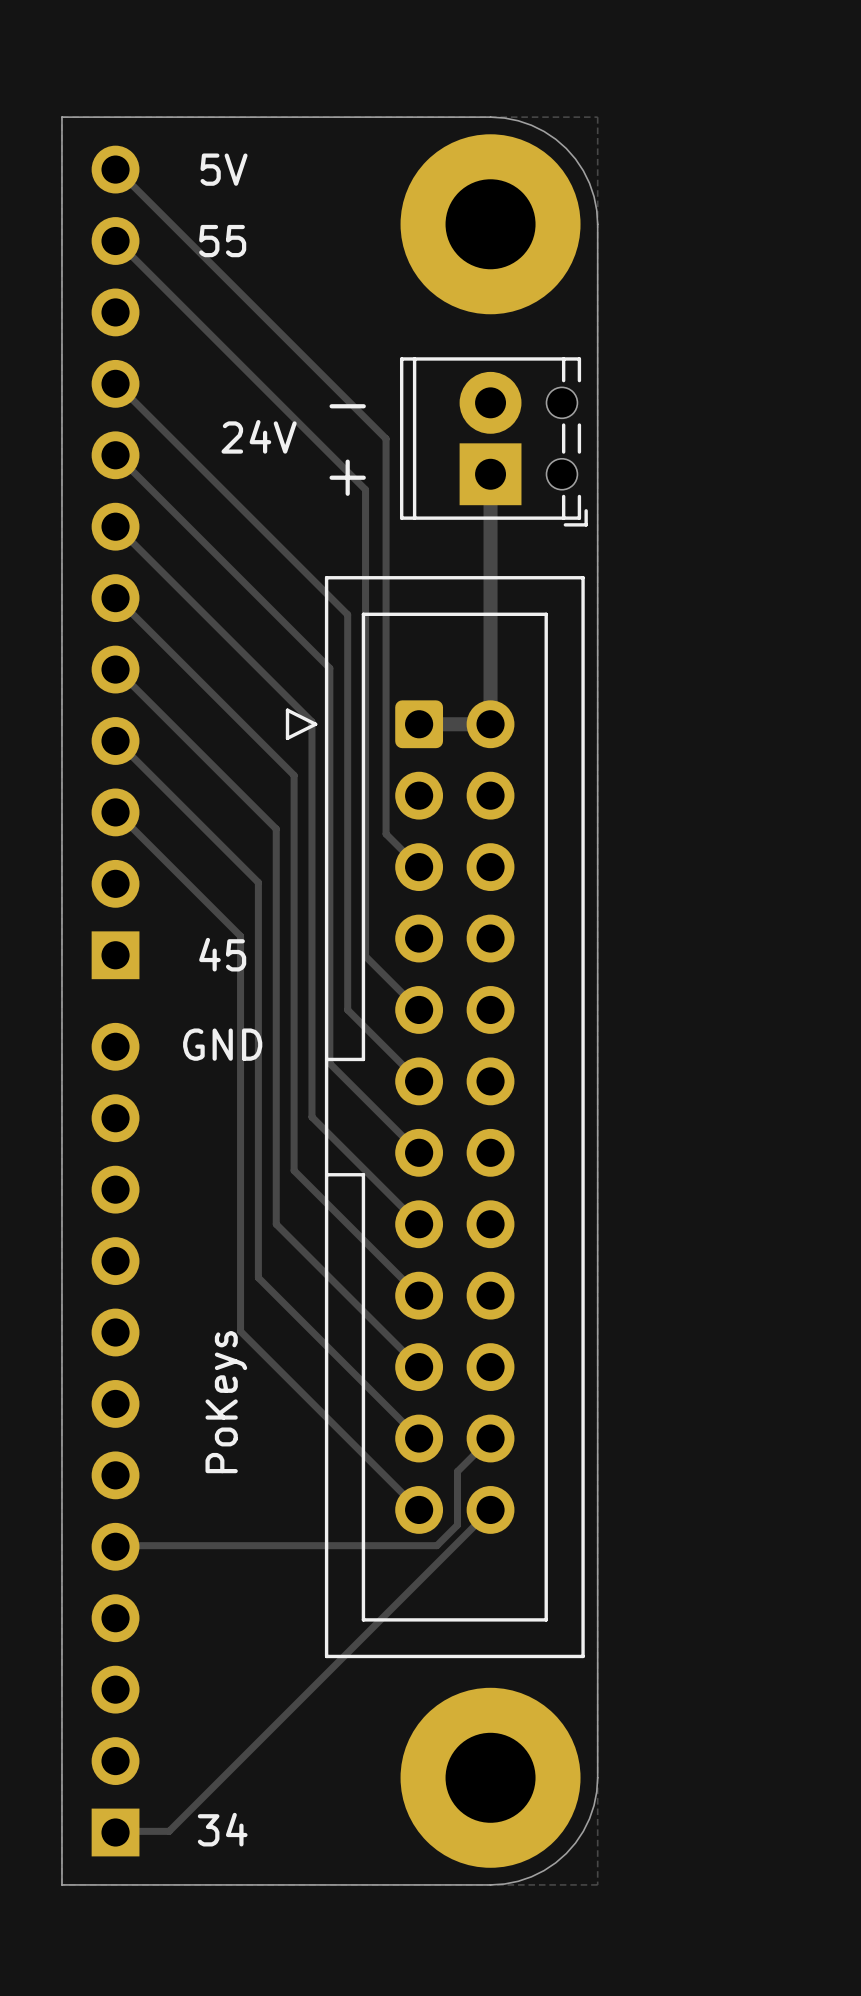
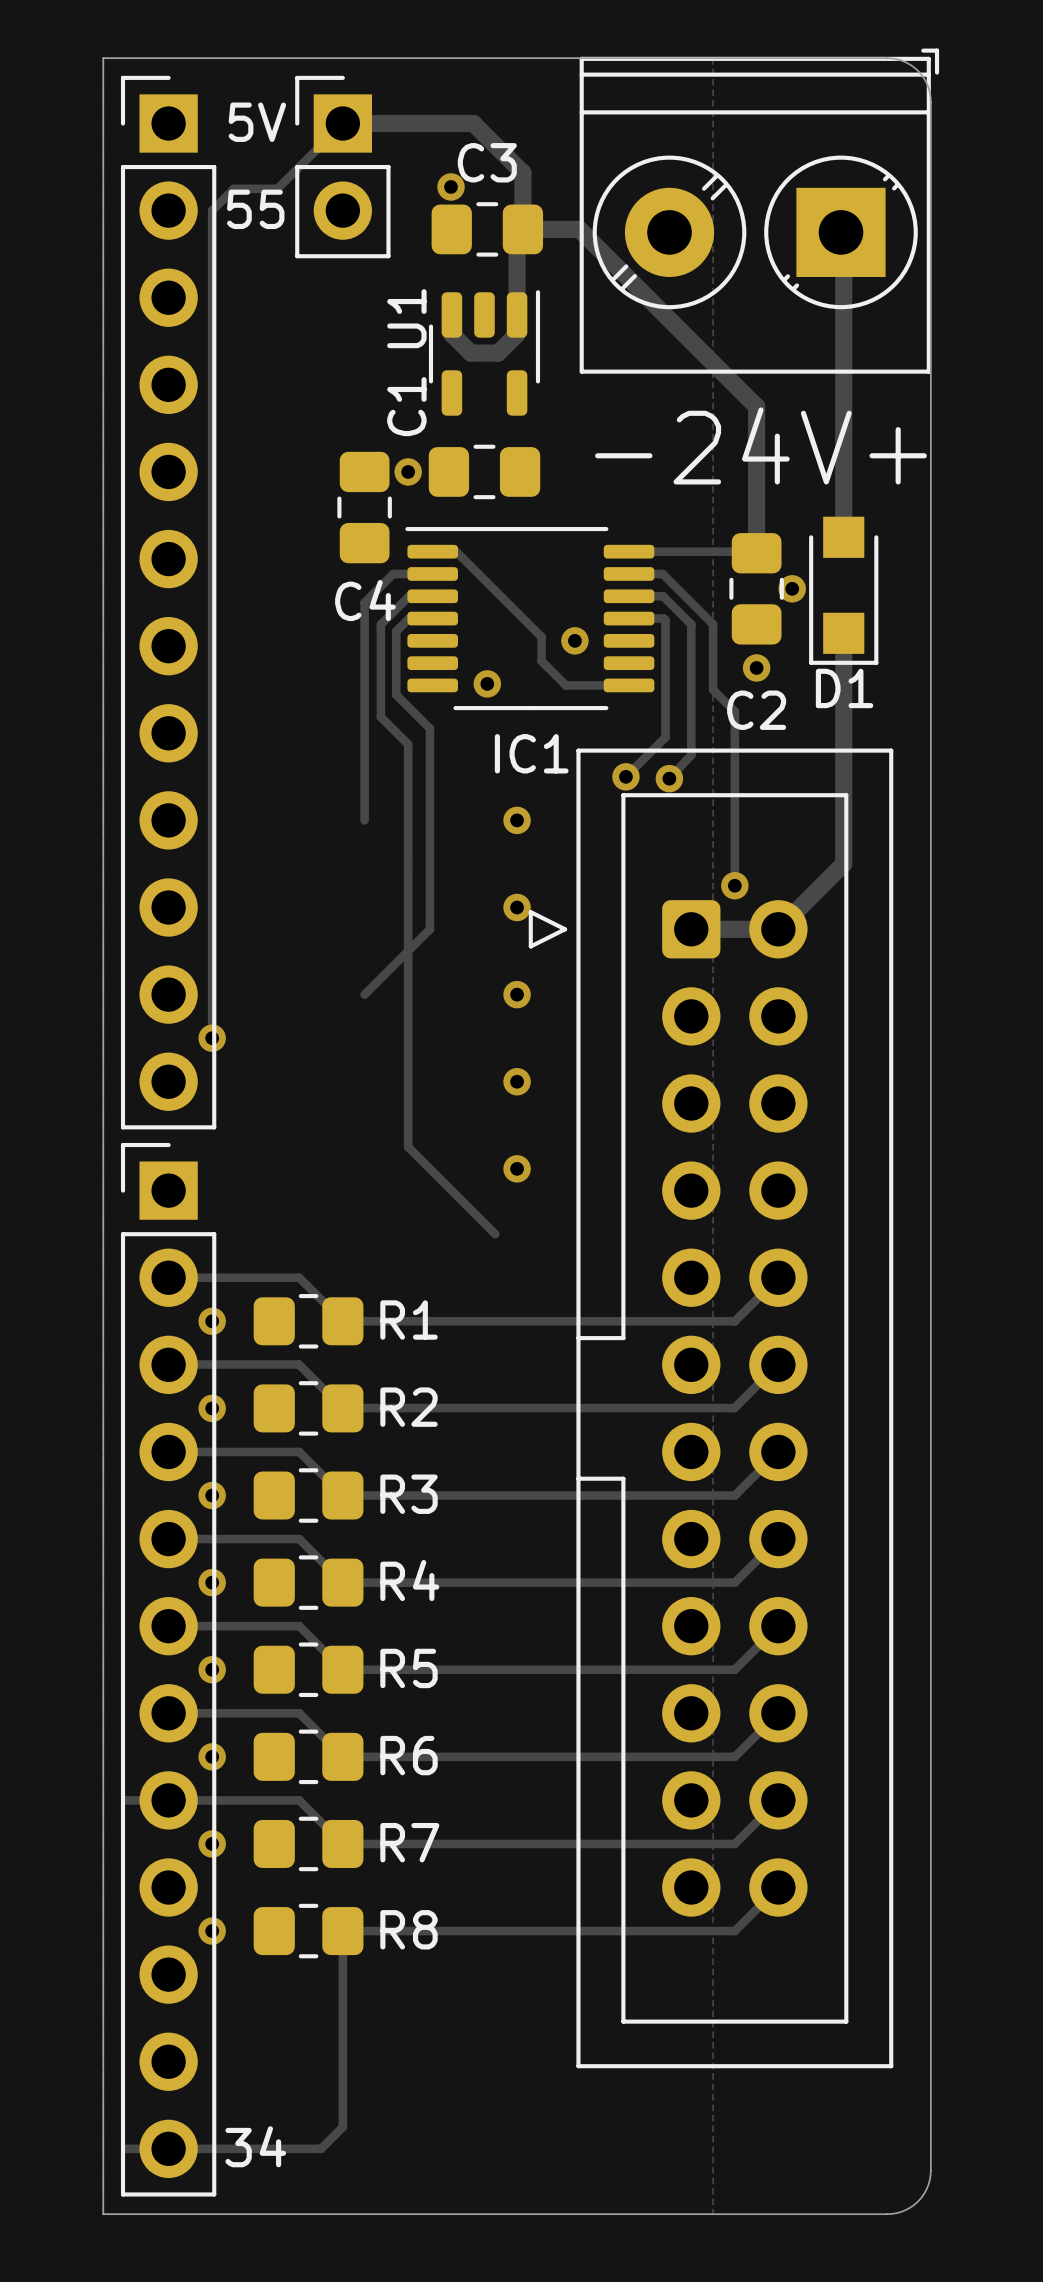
board edge: (97, 117) (61, 117) (61, 1884) (97, 1884) -> (103, 58) (103, 2214)
board edge: (490, 117) (518, 120) (531, 125) (544, 131) (566, 148) (583, 170) (589, 183) (596, 210) (597, 224) (597, 1777) (596, 1791) (589, 1818) (583, 1831) (566, 1853) (544, 1870) (531, 1876) (504, 1884) (490, 1884) -> (582, 58) (892, 58) (906, 62) (918, 70) (928, 87) (930, 101) (930, 2175) (926, 2189) (918, 2201) (906, 2209) (892, 2213) (582, 2214)
track: (115, 168) (386, 438) (386, 834) (419, 867) -> none
part: none -> (342, 167)
via: none -> (451, 186)
part: (490, 224) -> none
track: (115, 239) (365, 489) (365, 666) -> (432, 618) (409, 618) (396, 631) (396, 694) (429, 728)
part: none -> (759, 211)
C3: none -> (487, 229)
track: none -> (522, 229) (579, 229) (756, 406) (756, 553) (755, 551) (629, 551)
track: none -> (522, 229) (522, 172) (473, 123) (342, 123) (277, 188) (233, 188) (212, 210) (212, 1038)
track: none -> (522, 229) (517, 235) (517, 334) (498, 353) (470, 353) (451, 334) (451, 314)
track: none -> (840, 232) (843, 235) (843, 537)
U1: none -> (484, 352)
track: (115, 382) (347, 614) (347, 679) -> (432, 596) (409, 596) (380, 624) (380, 717) (408, 744)
text: - (347, 406) -> none
text: none -> -24V+ (760, 445)
text: 24V (259, 436) -> none
part: (493, 441) -> none
track: (115, 454) (329, 668) (329, 1063) (419, 1152) -> none
via: none -> (408, 471)
C4: none -> (484, 471)
track: (490, 474) (490, 724) (419, 724) -> none
text: + (347, 477) -> none
C1: none -> (364, 507)
track: none -> (456, 551) (541, 636) (541, 661) (565, 685) (629, 685)
track: (115, 525) (311, 721) -> (432, 573) (393, 573) (364, 602) (364, 795)
track: none -> (629, 573) (662, 573) (713, 624) (713, 689) (734, 711) (734, 885)
C2: none -> (756, 588)
via: none -> (792, 588)
D1: none -> (843, 590)
track: none -> (629, 596) (663, 596) (691, 624) (691, 755) (669, 778)
part: (115, 562) -> none
part: none -> (168, 602)
IC1: none -> (529, 618)
track: none -> (629, 618) (663, 618) (665, 620) (665, 737) (625, 776)
track: none -> (843, 633) (843, 863) (778, 929) (691, 929)
via: none -> (574, 640)
track: (115, 596) (294, 775) (294, 1170) (419, 1295) -> none
via: none -> (756, 667)
via: none -> (487, 683)
track: (115, 668) (276, 829) (276, 1224) (419, 1367) -> none
via: none -> (625, 776)
via: none -> (669, 778)
track: (115, 739) (258, 882) (258, 1277) (419, 1438) -> none
track: (311, 742) (311, 1117) (419, 1224) -> none
via: none -> (517, 820)
via: none -> (734, 885)
track: (115, 811) (240, 936) (240, 1331) (419, 1509) -> none
via: none -> (517, 907)
track: (365, 831) (365, 956) (419, 1009) -> (429, 929) (364, 994)
via: none -> (517, 994)
via: none -> (212, 1038)
text: 45 (222, 954) -> none
via: none -> (517, 1081)
via: none -> (517, 1168)
text: GND (222, 1044) -> none
track: none -> (168, 1277) (299, 1277) (342, 1321) (734, 1321) (778, 1277)
part position: (435, 1117) -> (711, 1408)
via: none -> (212, 1321)
R1: none -> (308, 1321)
track: none -> (168, 1364) (298, 1364) (342, 1408) (734, 1408) (778, 1364)
via: none -> (212, 1408)
R2: none -> (308, 1408)
track: none -> (168, 1451) (299, 1451) (342, 1495) (734, 1495) (778, 1451)
via: none -> (212, 1495)
R3: none -> (308, 1495)
track: none -> (168, 1539) (299, 1539) (342, 1582) (734, 1582) (778, 1539)
via: none -> (212, 1582)
R4: none -> (308, 1582)
track: none -> (168, 1626) (299, 1626) (342, 1669) (734, 1669) (778, 1626)
text: PoKeys (226, 1402) -> none
part: none -> (168, 1669)
via: none -> (212, 1669)
R5: none -> (308, 1669)
track: (490, 1438) (457, 1471) (457, 1525) (436, 1545) (258, 1545) -> (778, 1800) (734, 1843) (342, 1843) (299, 1800)
part: (115, 1439) -> none
track: none -> (168, 1713) (299, 1713) (342, 1756) (734, 1756) (778, 1713)
via: none -> (212, 1756)
R6: none -> (308, 1756)
track: (490, 1509) (169, 1831) -> (778, 1887) (734, 1931) (342, 1931) (342, 2127) (321, 2148) (190, 2148)
via: none -> (212, 1843)
R7: none -> (308, 1843)
via: none -> (212, 1931)
R8: none -> (308, 1931)
part: (490, 1777) -> none

